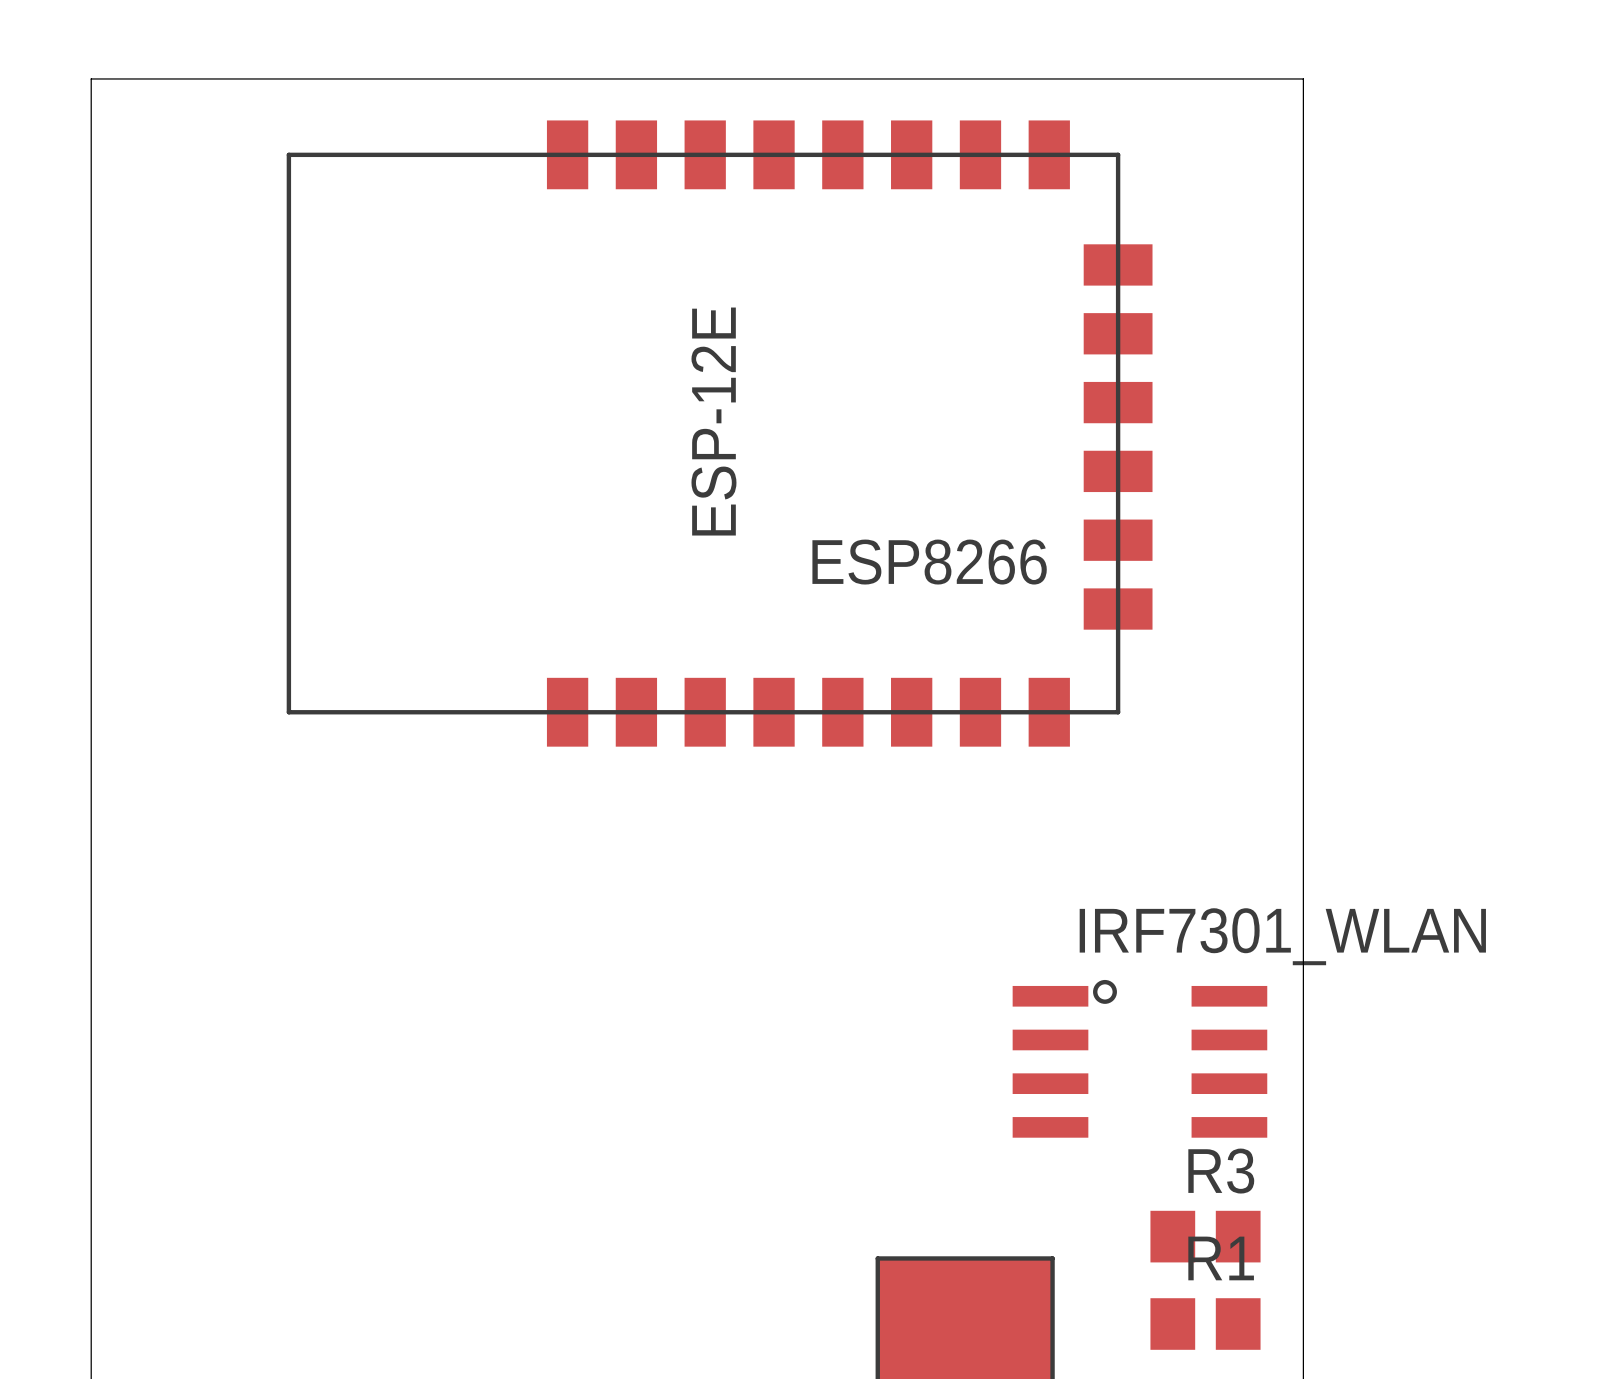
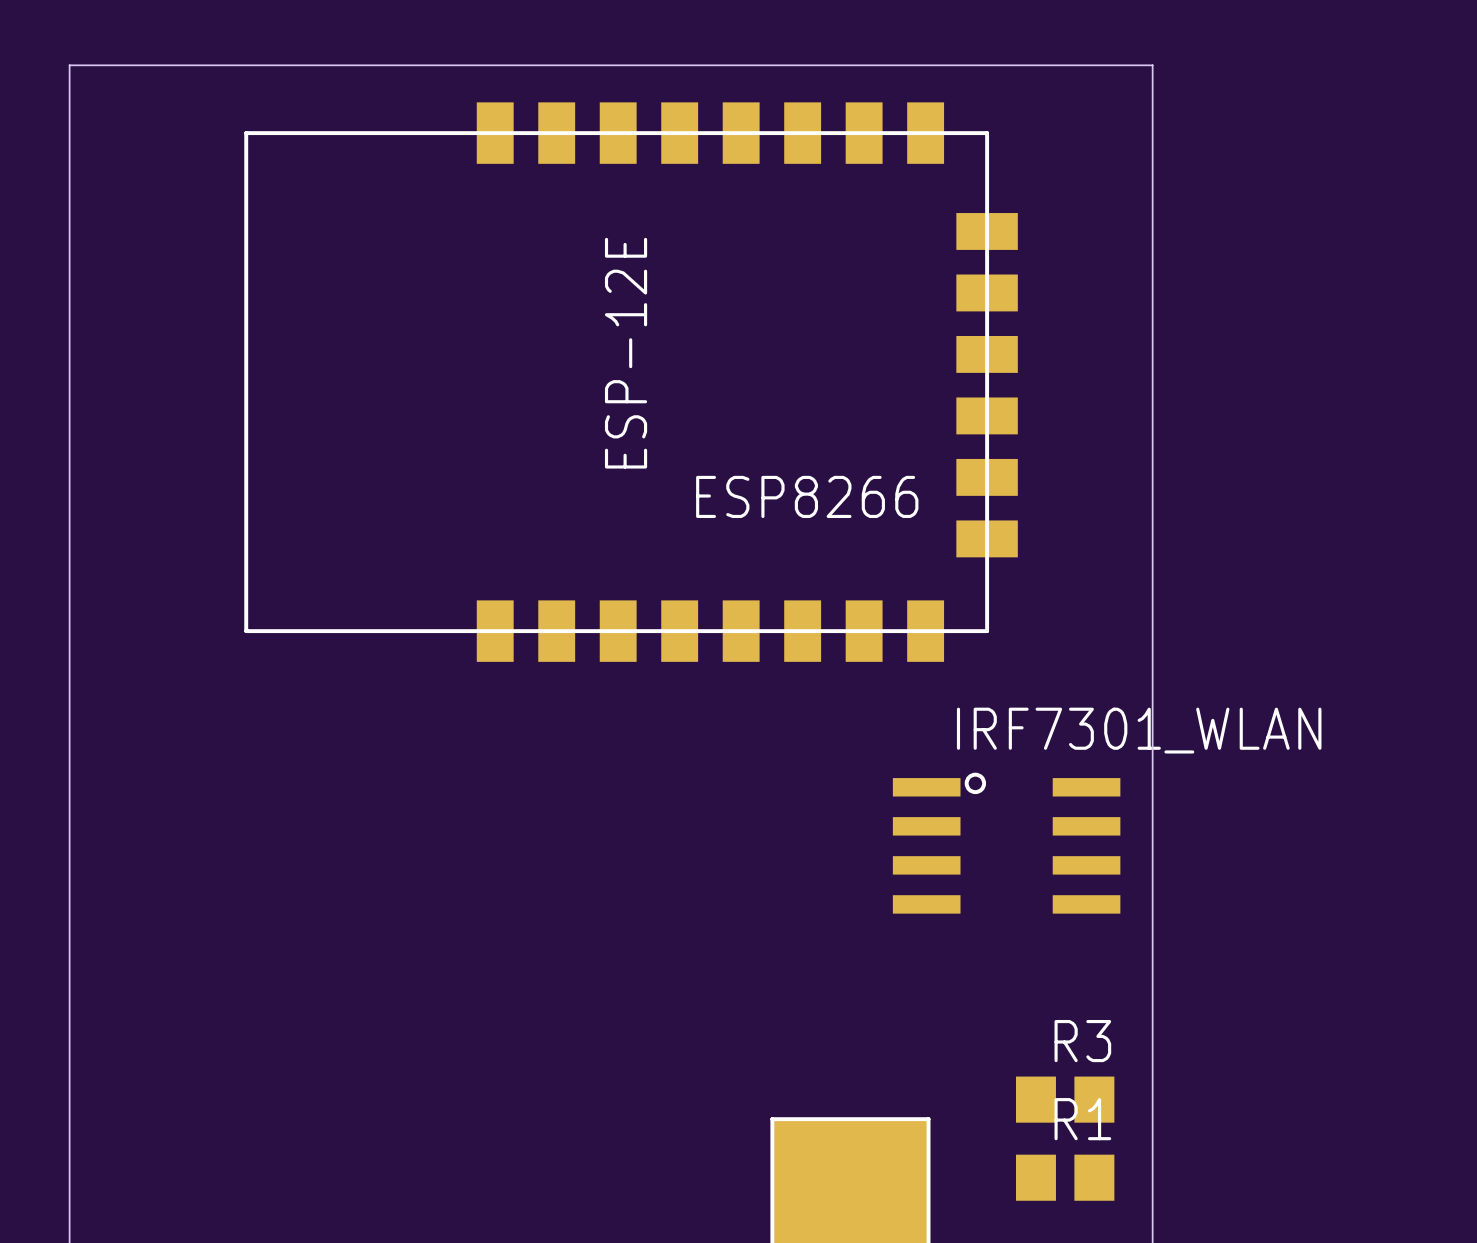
IRF7301_WLAN position: (1139, 1058) -> (1006, 843)

